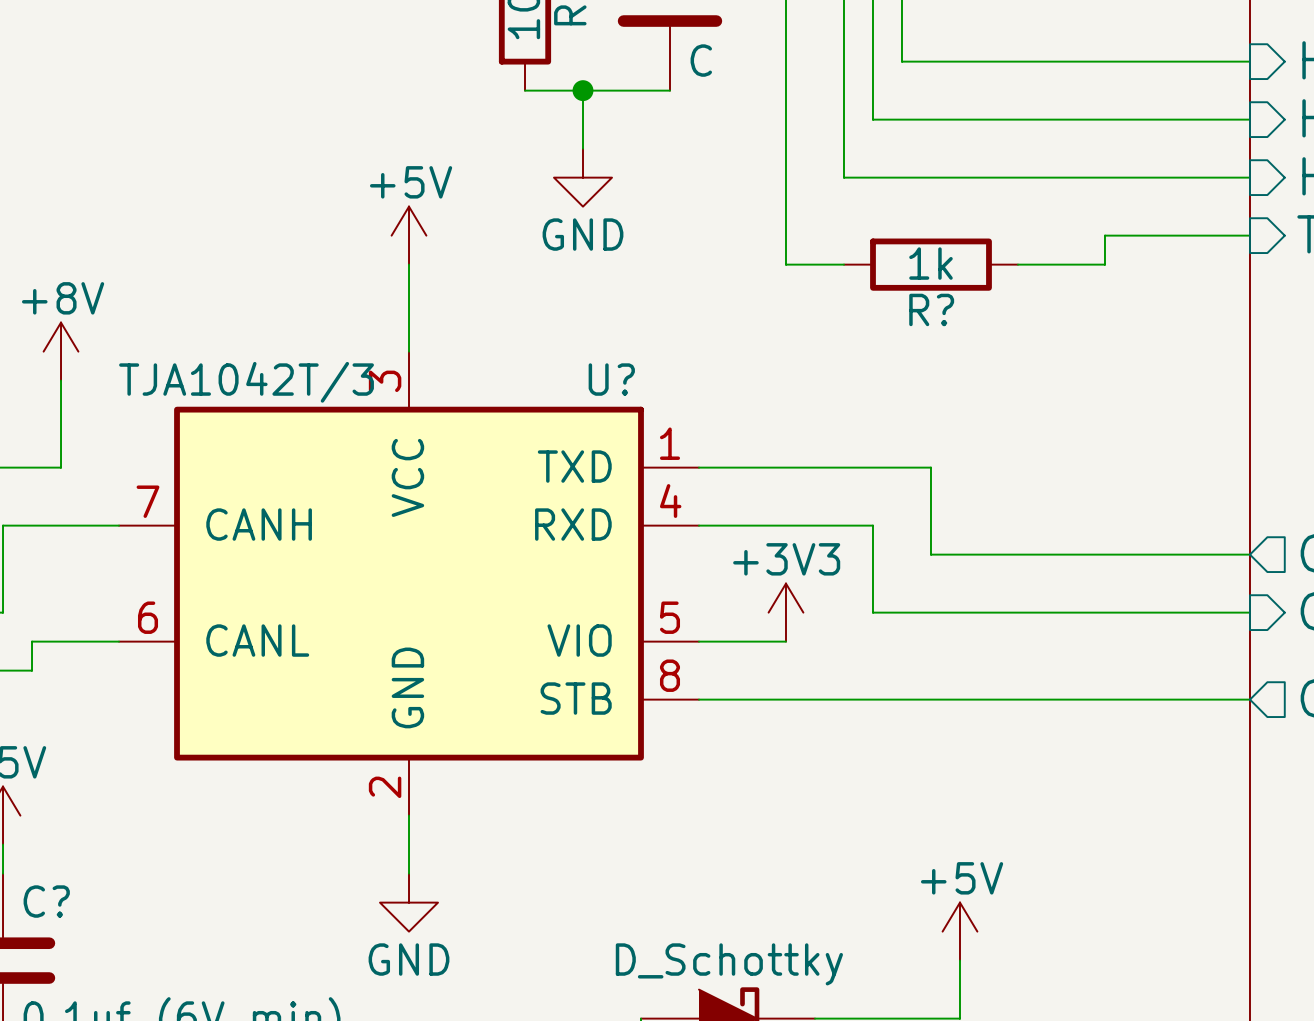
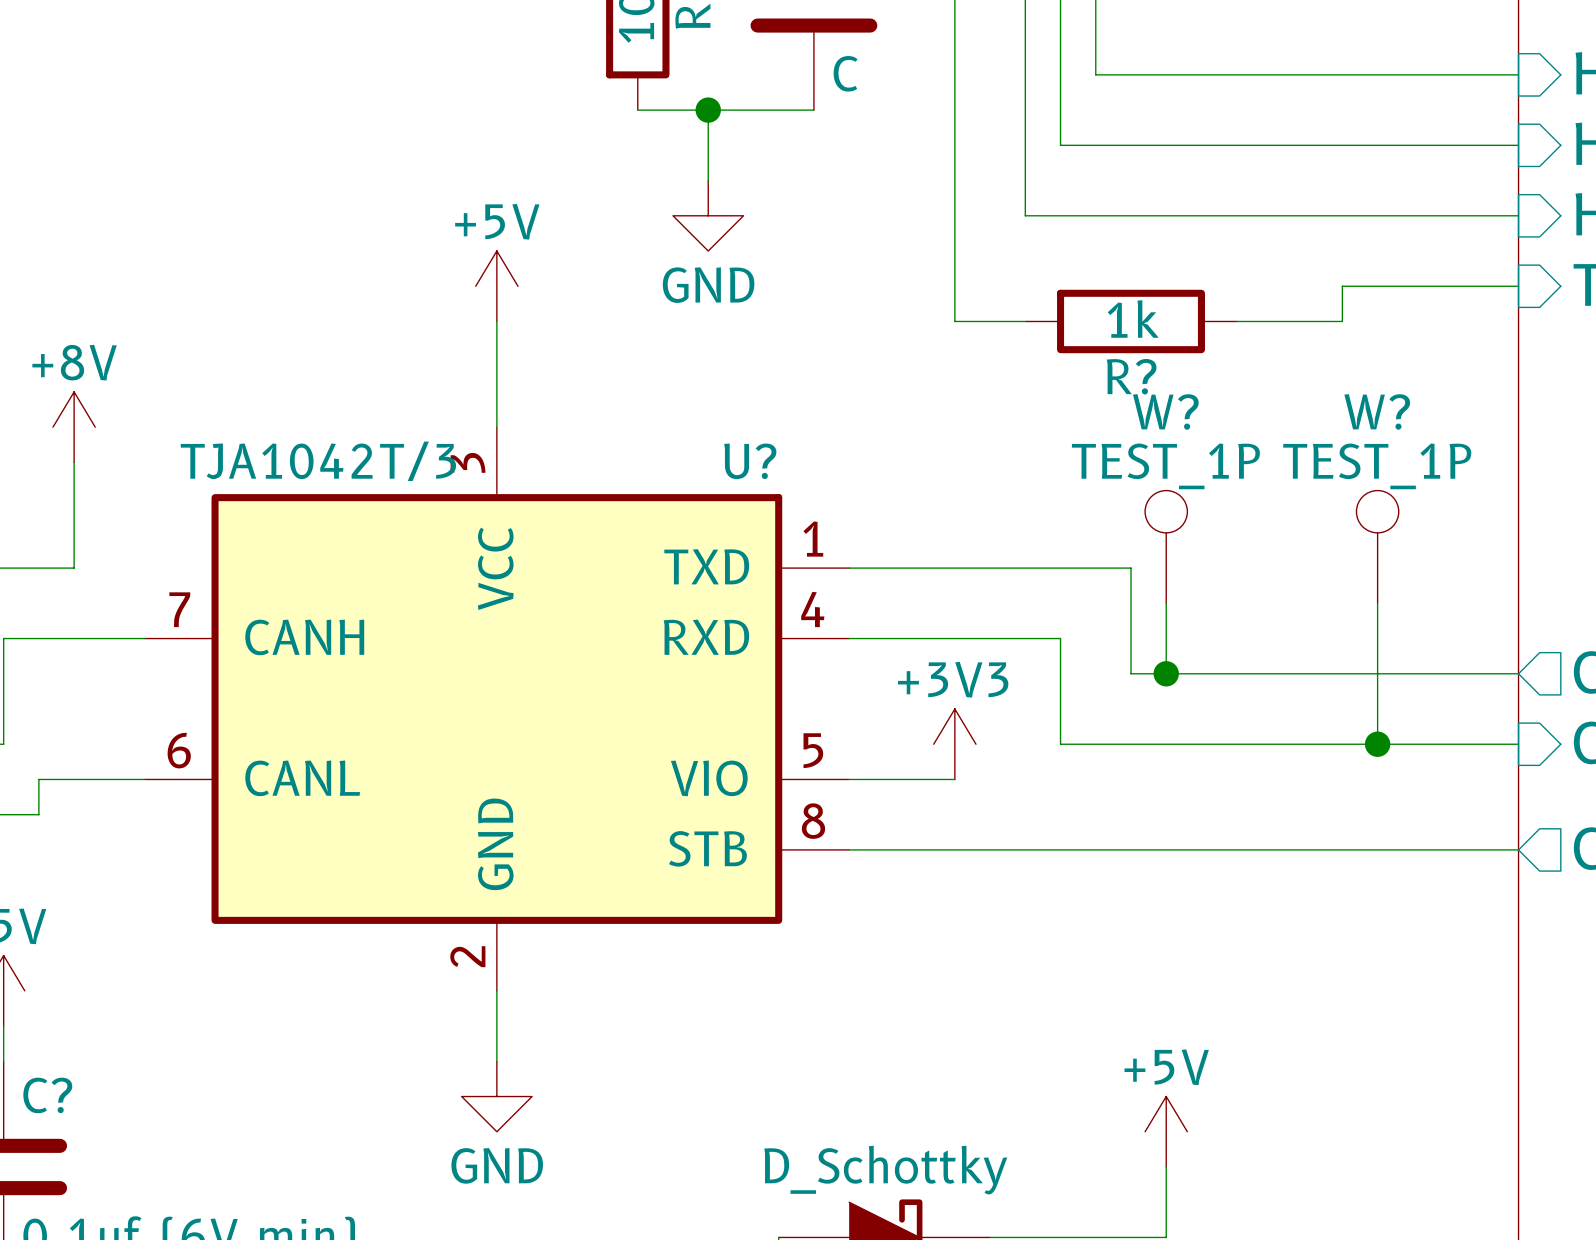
W?: none -> TEST_1P (1166, 546)
W?: none -> TEST_1P (1377, 546)
wire: none -> (1166, 603) (1166, 673)
wire: none -> (1377, 603) (1377, 744)
junction: none -> (1166, 673)
junction: none -> (1377, 744)

